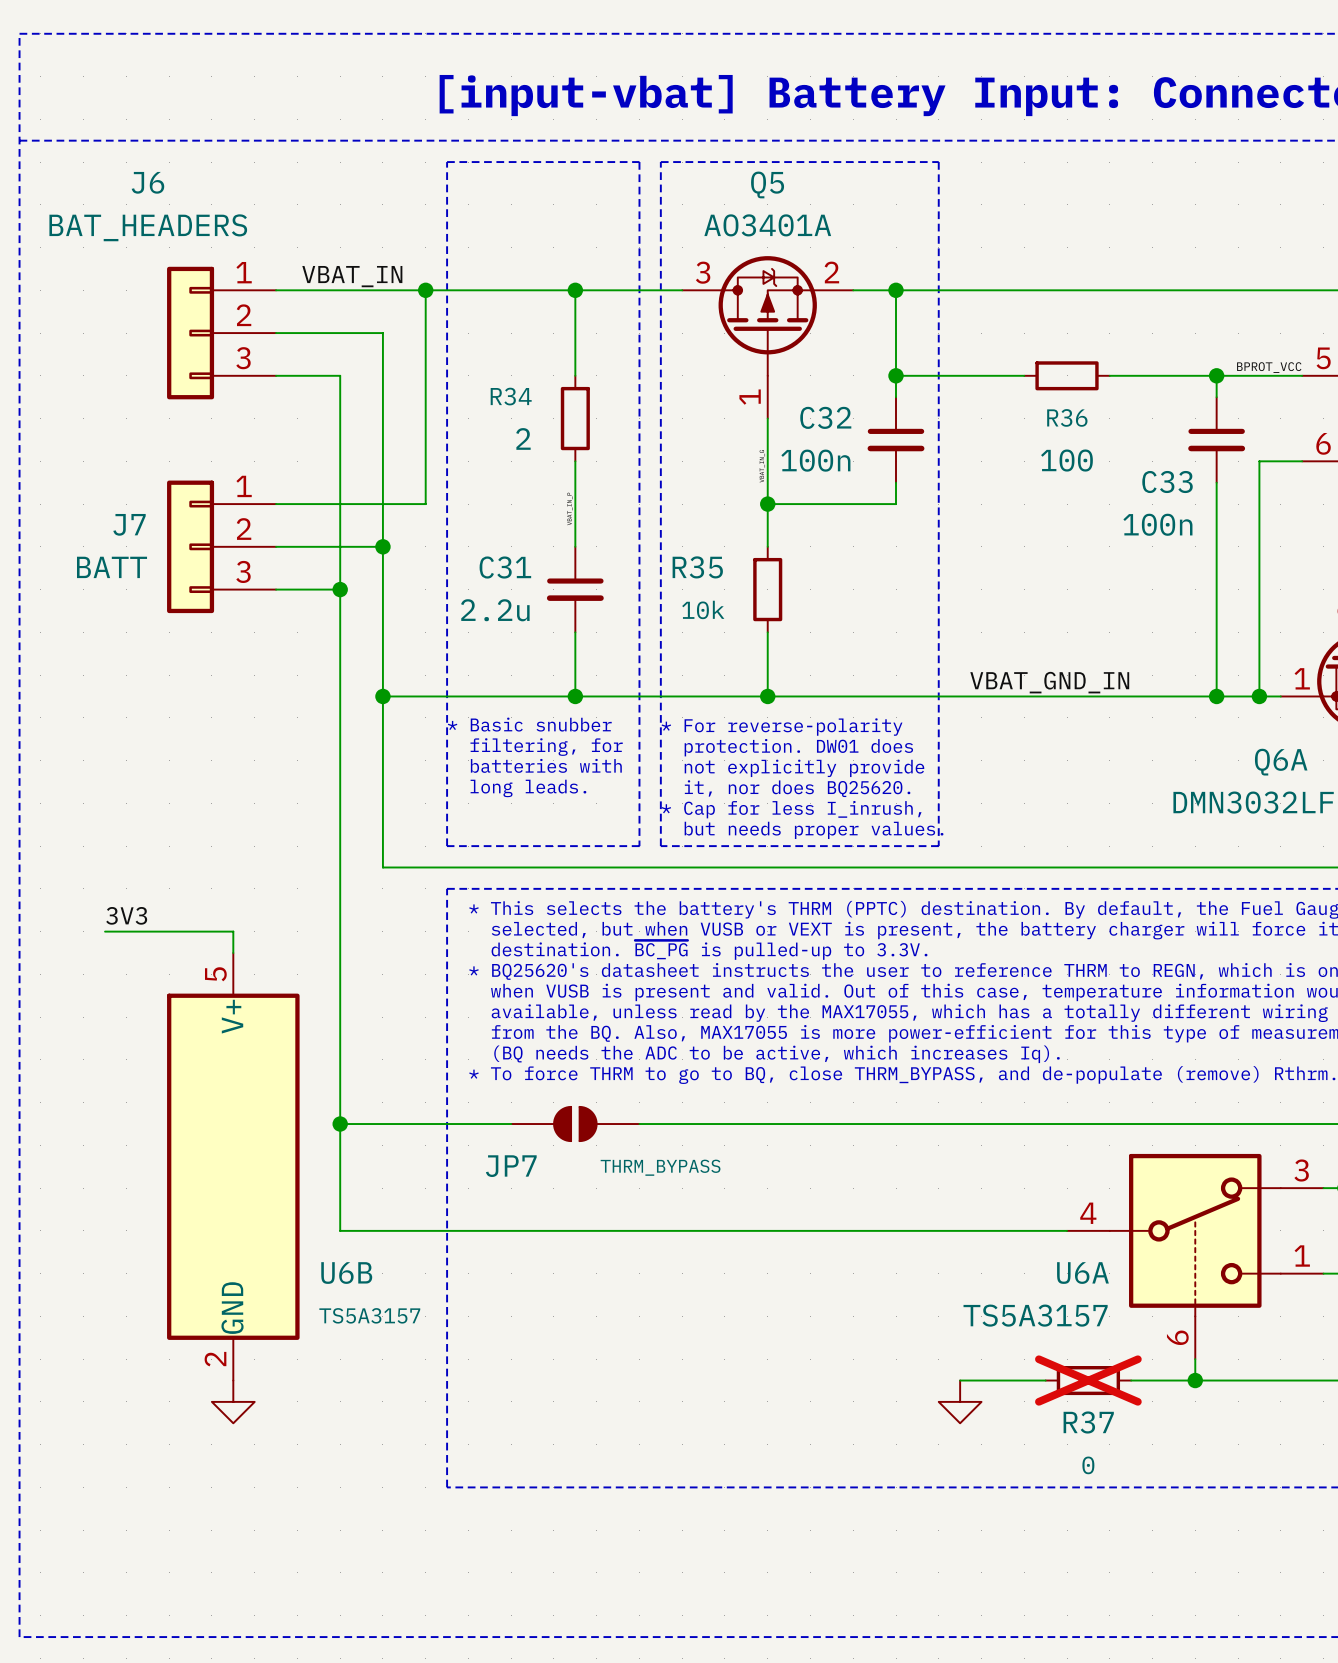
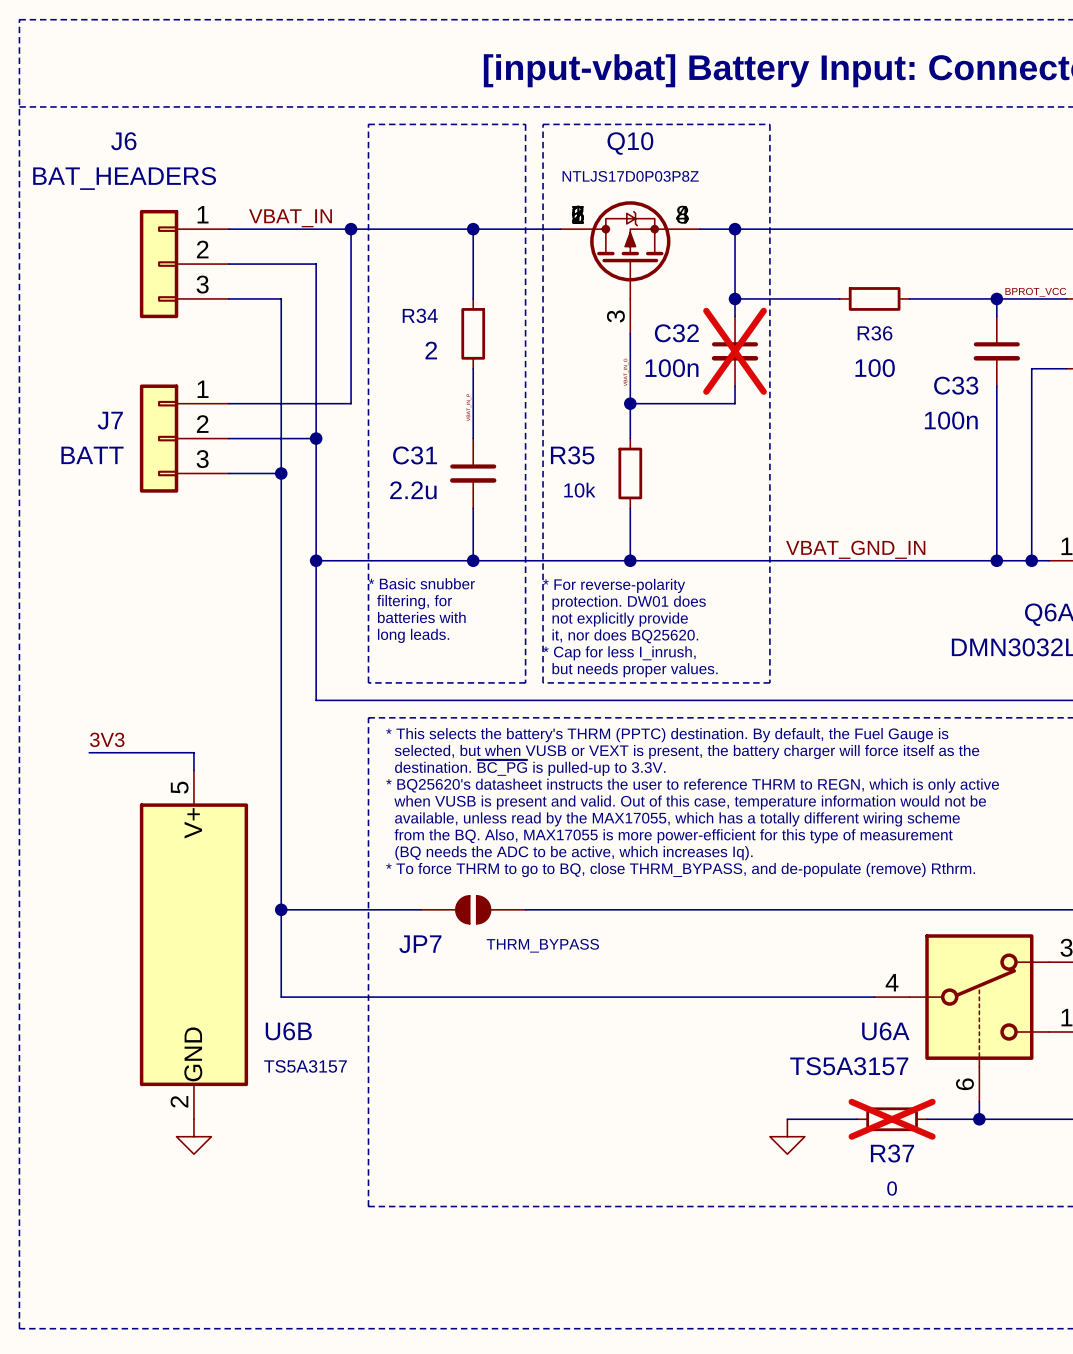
Q5 name: Q5 (767, 184) -> Q10 (630, 143)
Q5 value: AO3401A (767, 225) -> NTLJS17D0P03P8Z (630, 176)
Q5 symbol: [682, 256, 854, 419] -> [560, 201, 701, 334]
C32 do-not-place cross: none -> (735, 351)

